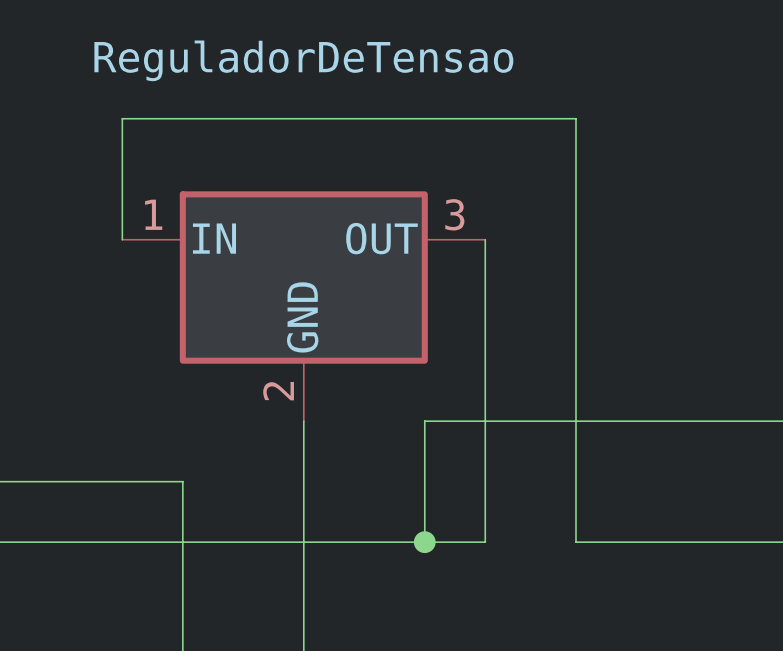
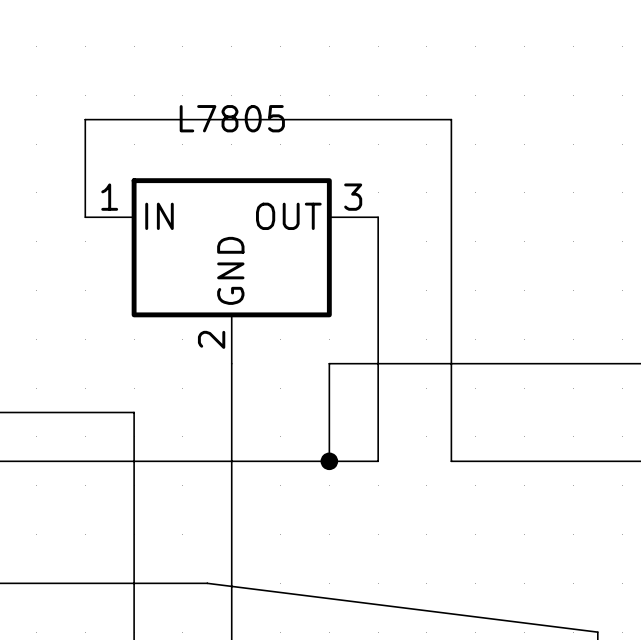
ReguladorDeTensao name: ReguladorDeTensao (303, 60) -> none
ReguladorDeTensao value: none -> L7805 (232, 118)

